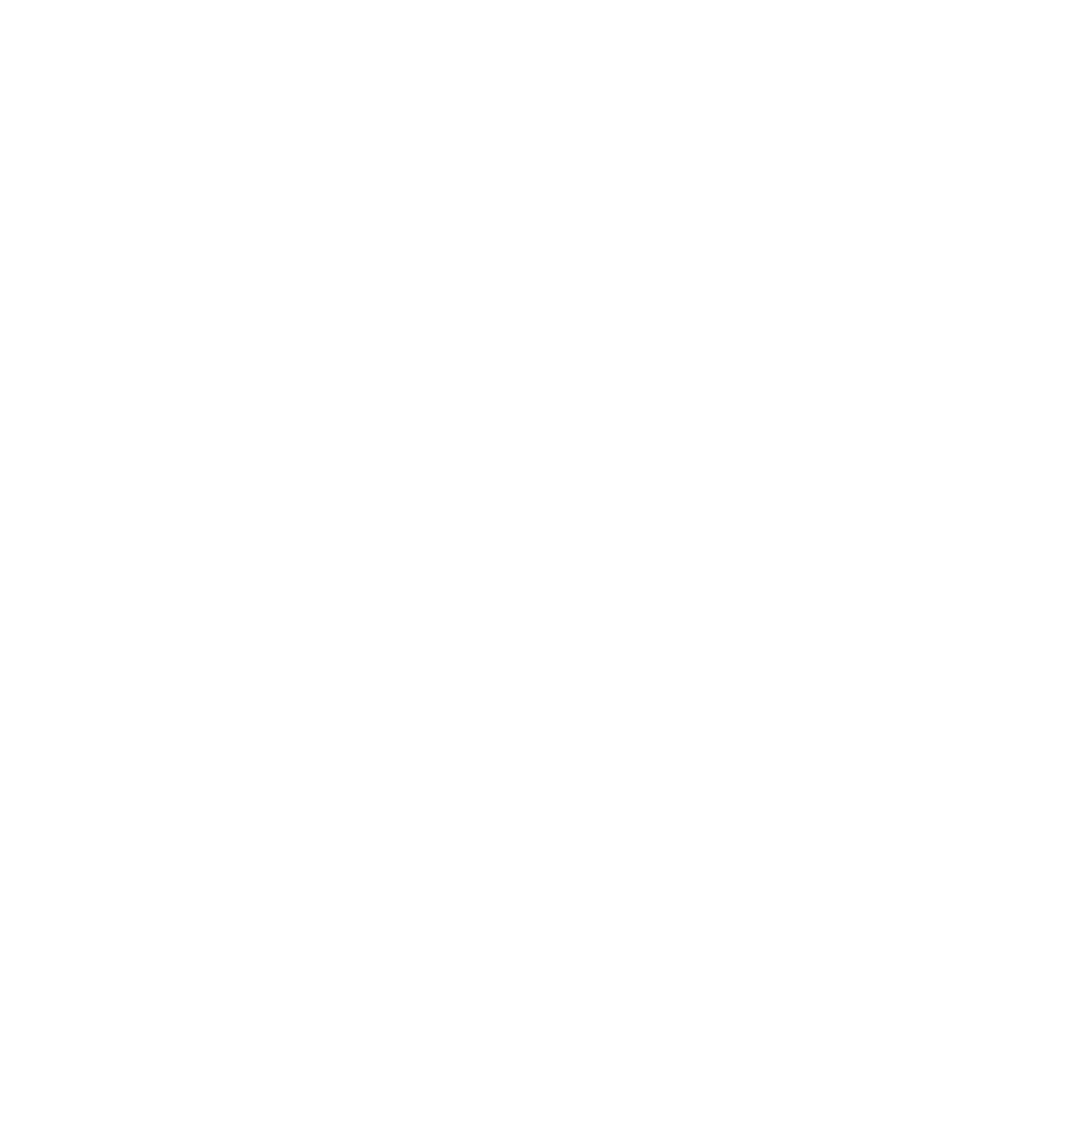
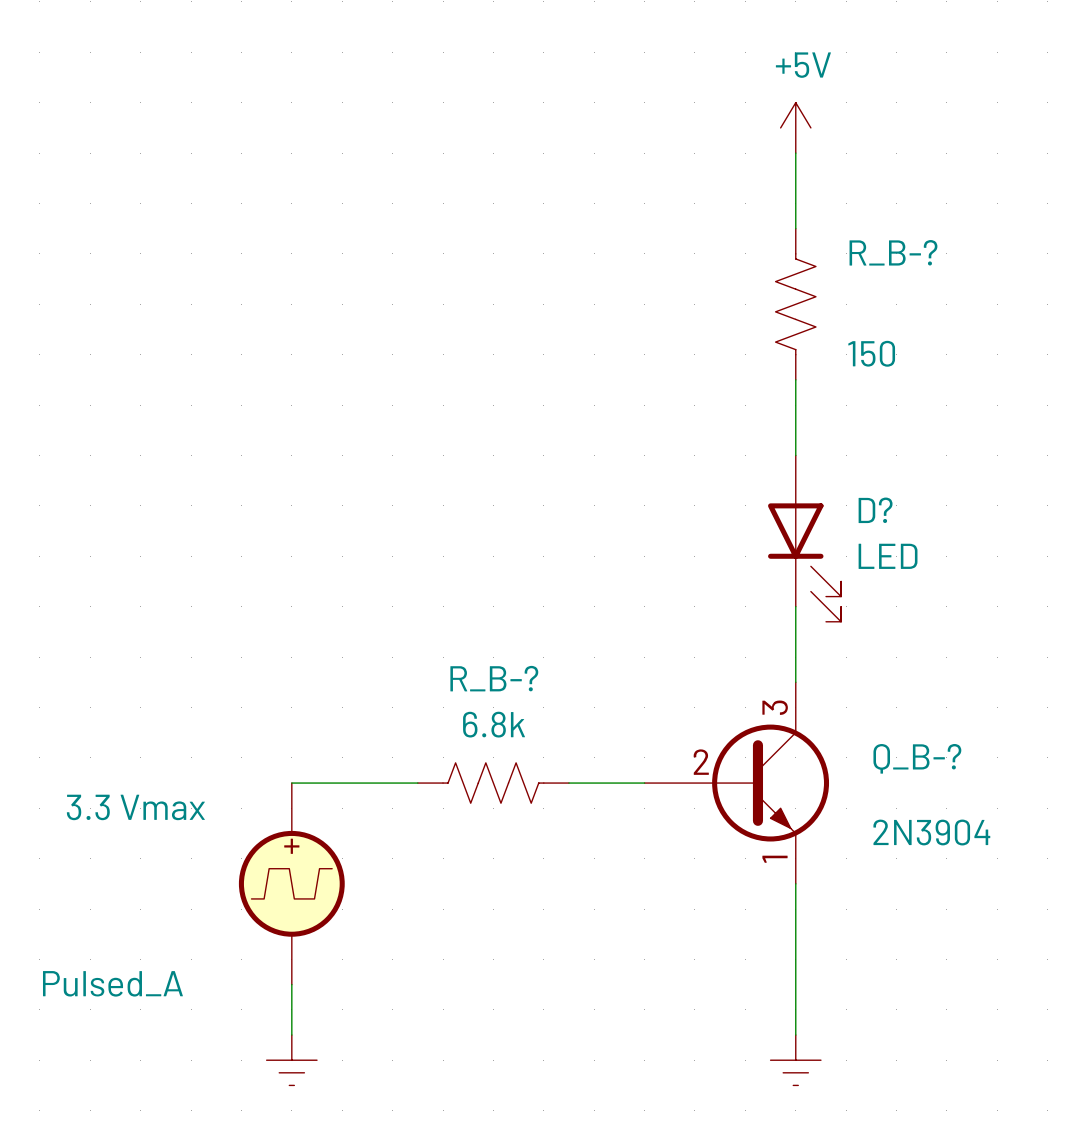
power symbol: none -> +5V (795, 127)
wire: none -> (795, 153) (795, 228)
R_B-?: none -> 150 (795, 304)
wire: none -> (795, 379) (795, 455)
D?: none -> LED (804, 538)
wire: none -> (795, 606) (795, 682)
wire: none -> (291, 783) (417, 783)
R_B-?: none -> 6.8k (493, 783)
wire: none -> (568, 783) (644, 783)
Q_B-?: none -> 2N3904 (736, 783)
Pulsed_A: none -> 3.3 Vmax (291, 883)
wire: none -> (795, 883) (795, 1035)
wire: none -> (291, 984) (291, 1035)
power symbol: none -> (291, 1060)
power symbol: none -> (795, 1060)

